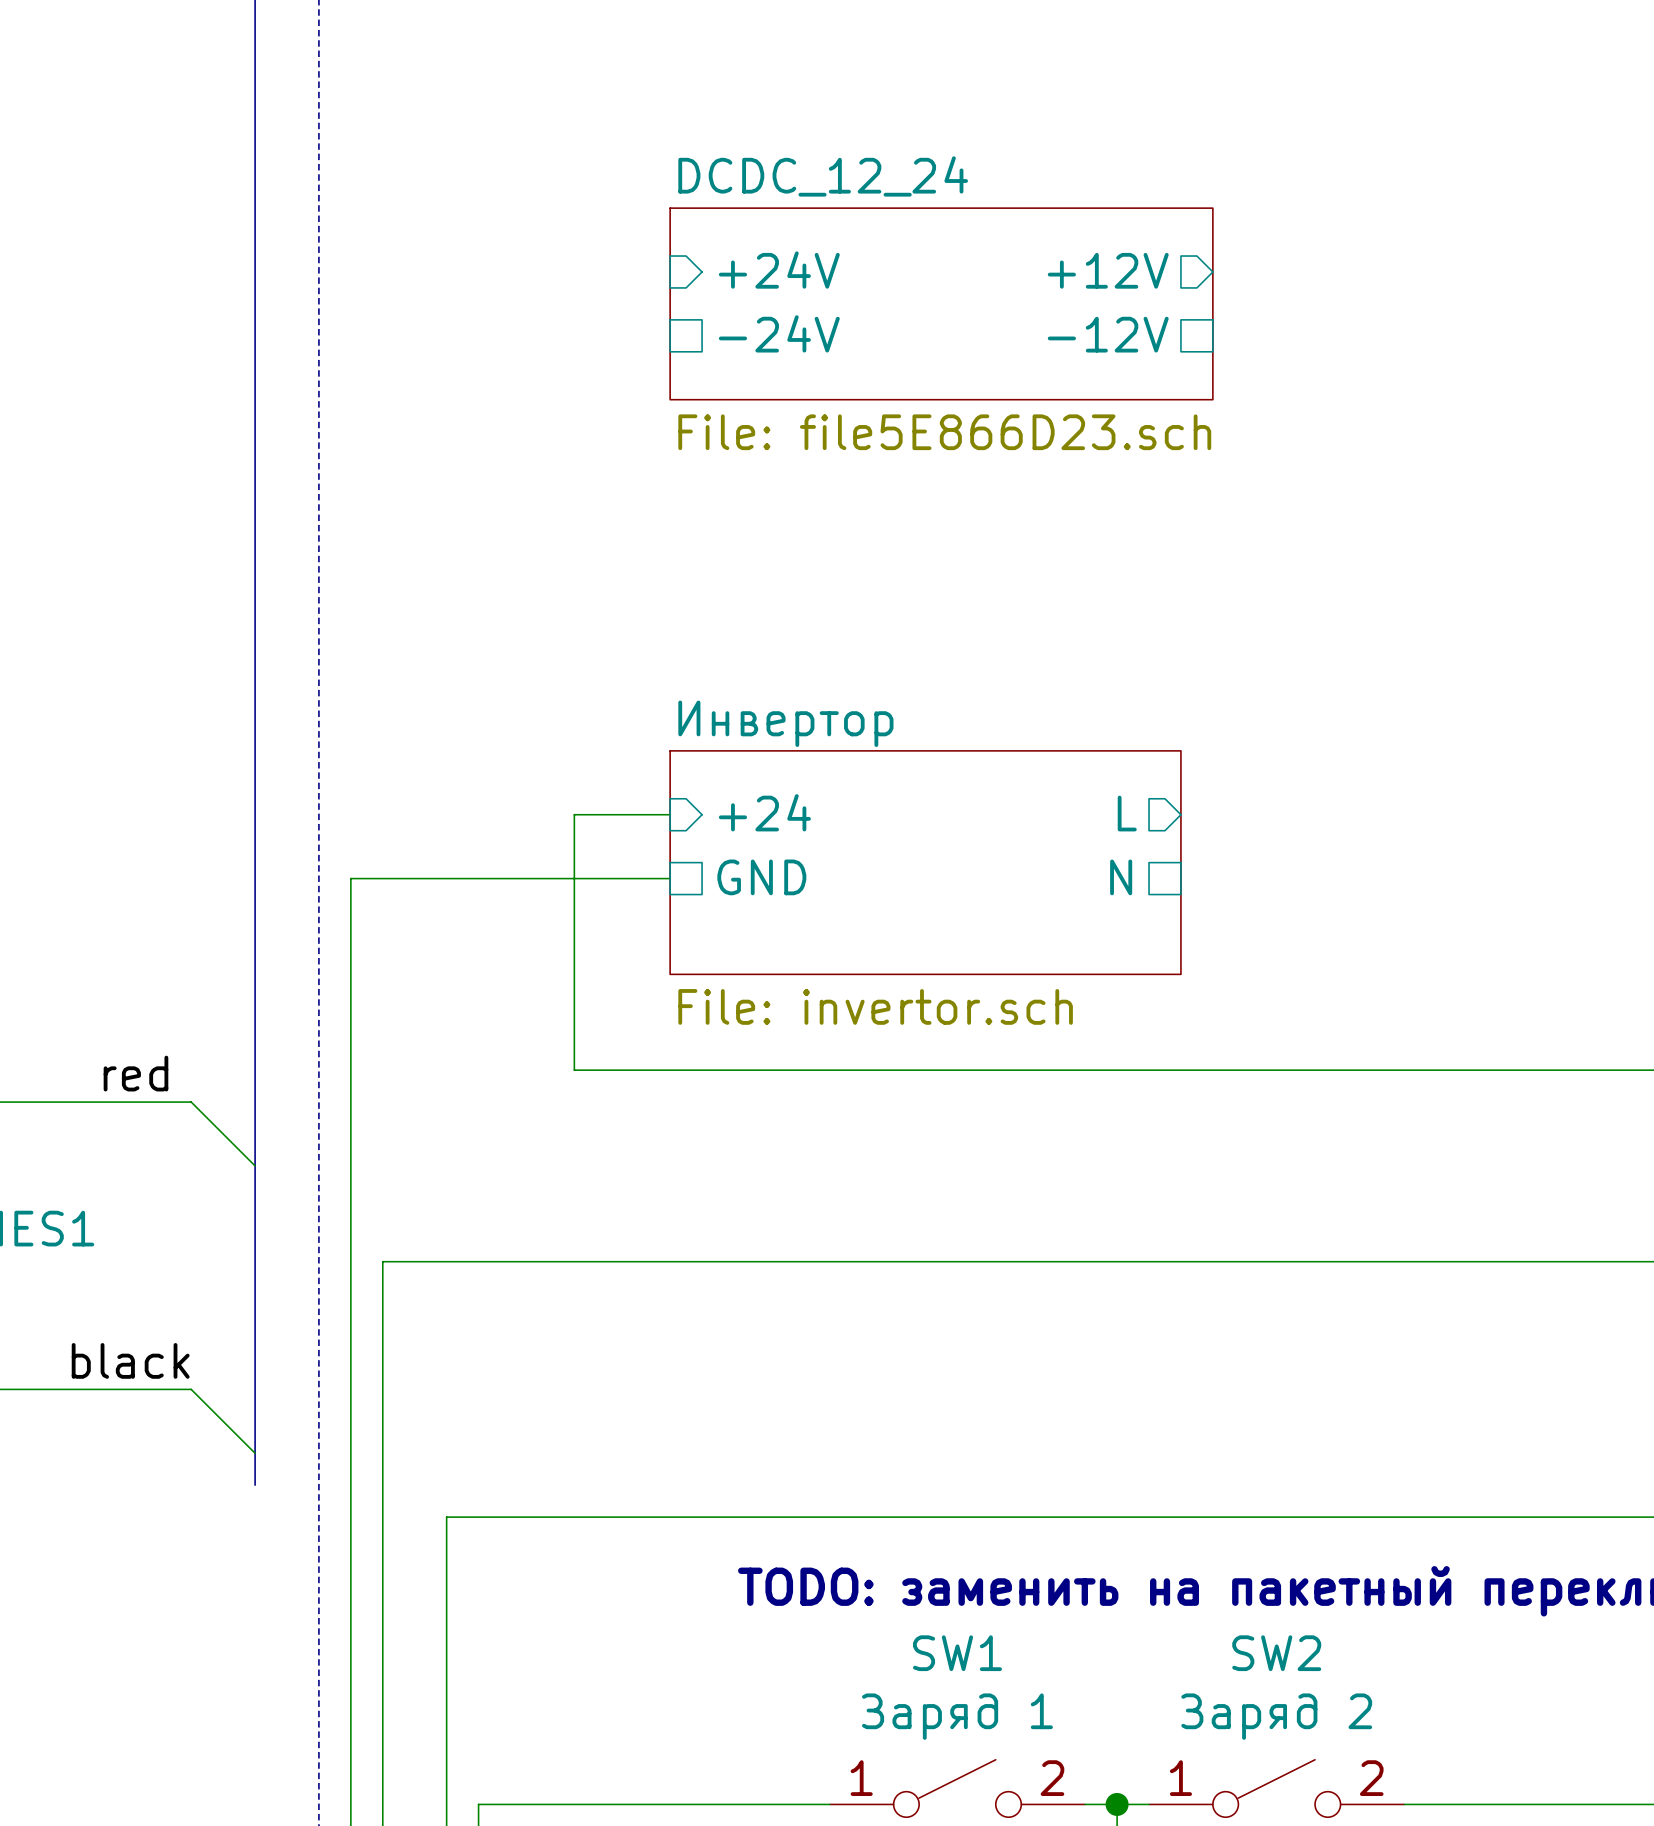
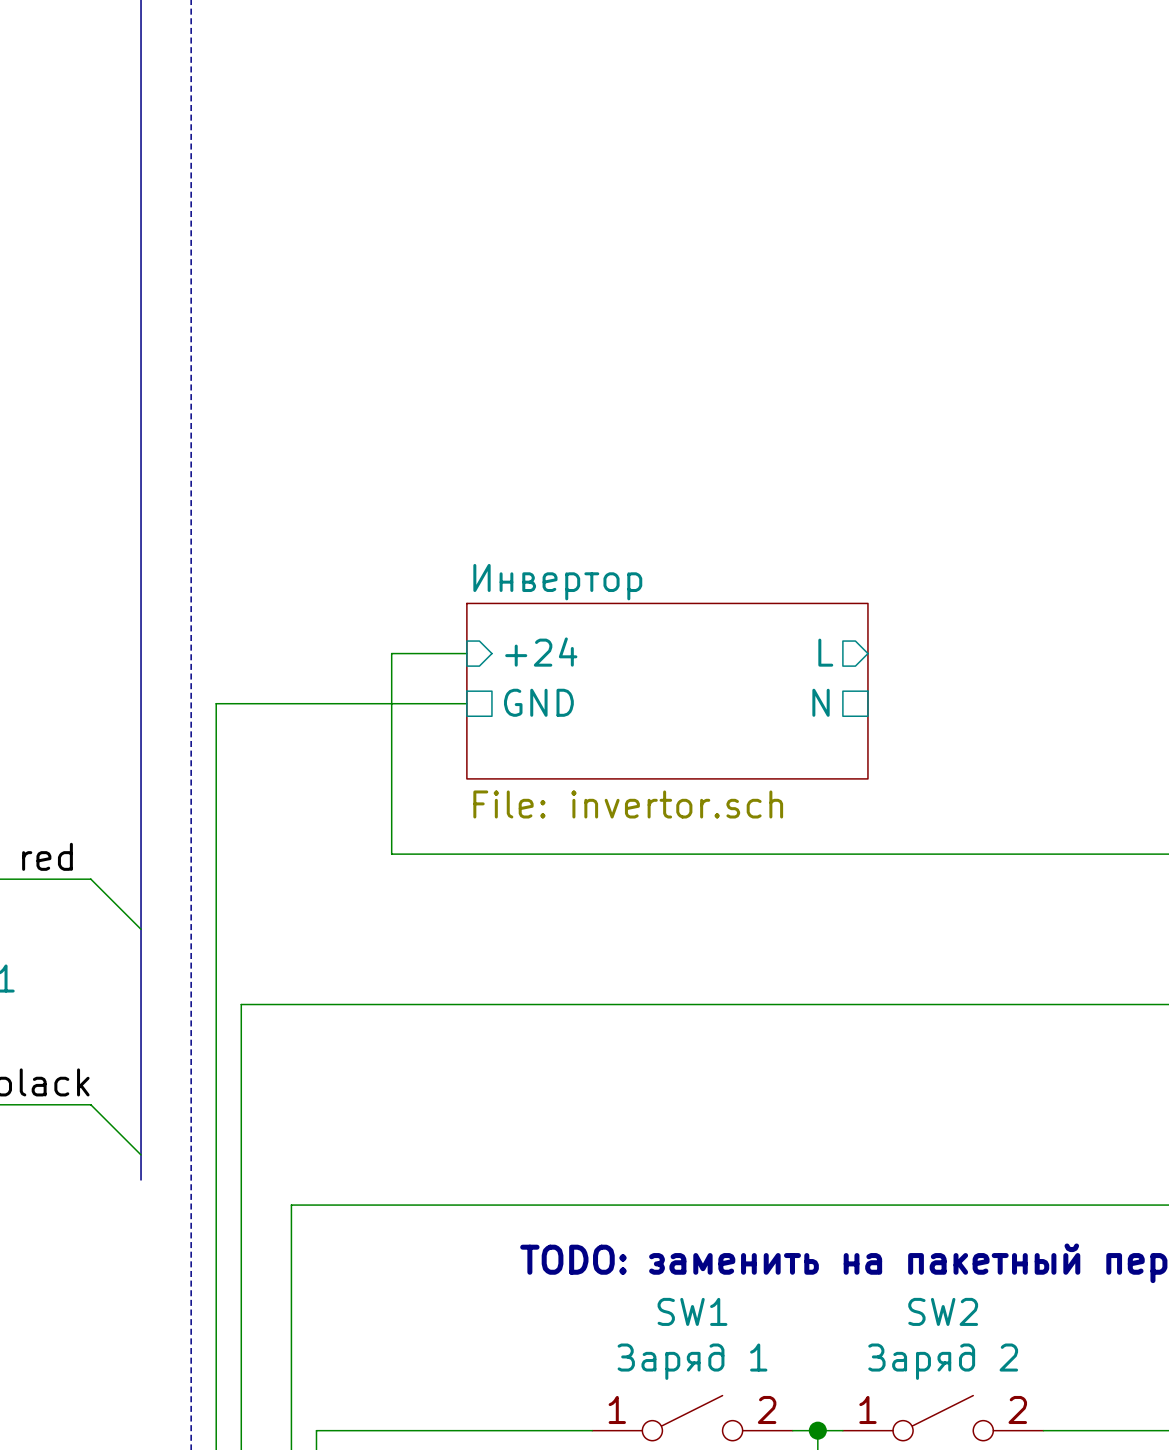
sheet pin: +24V (779, 270) -> none
sheet pin: +12V (1108, 270) -> none
sheet DCDC_12_24: File: file5E866D23.sch (941, 303) -> none
sheet pin: -24V (779, 333) -> none
sheet pin: -12V (1108, 334) -> none

